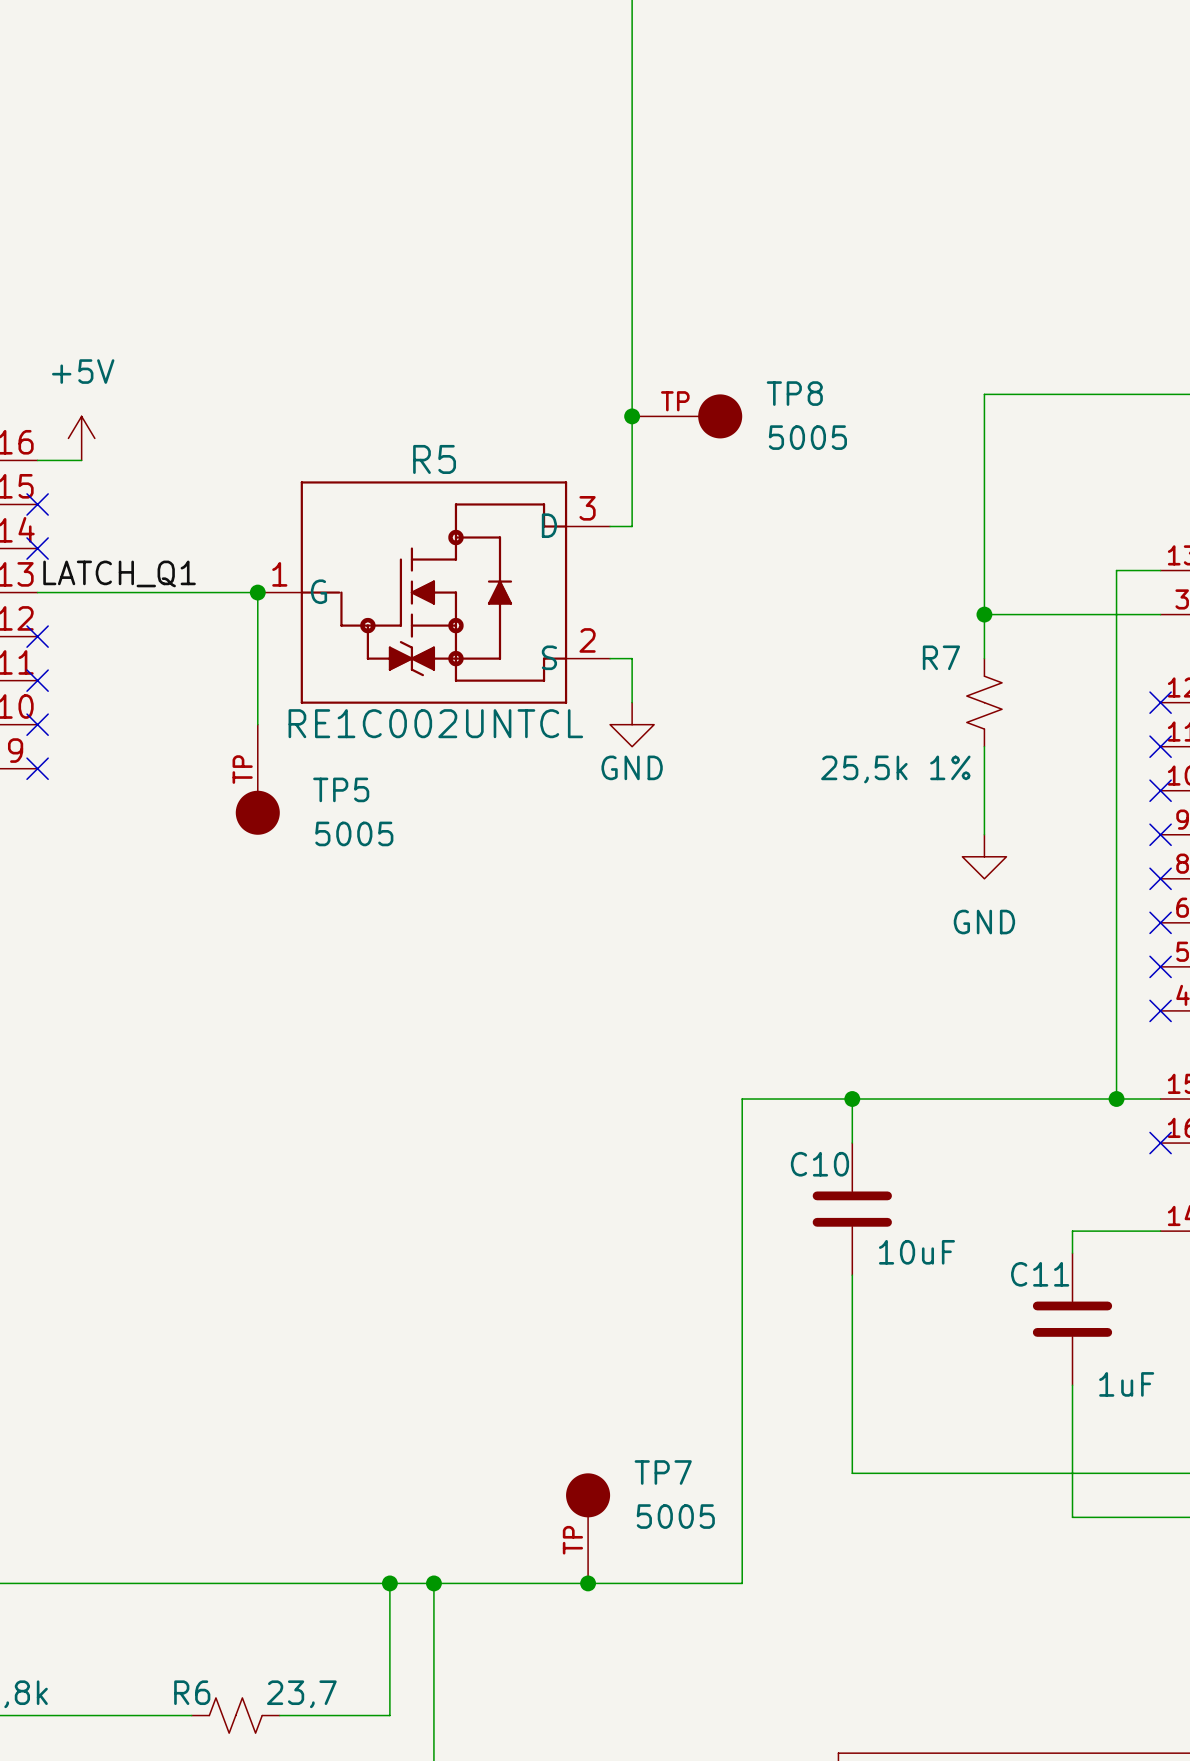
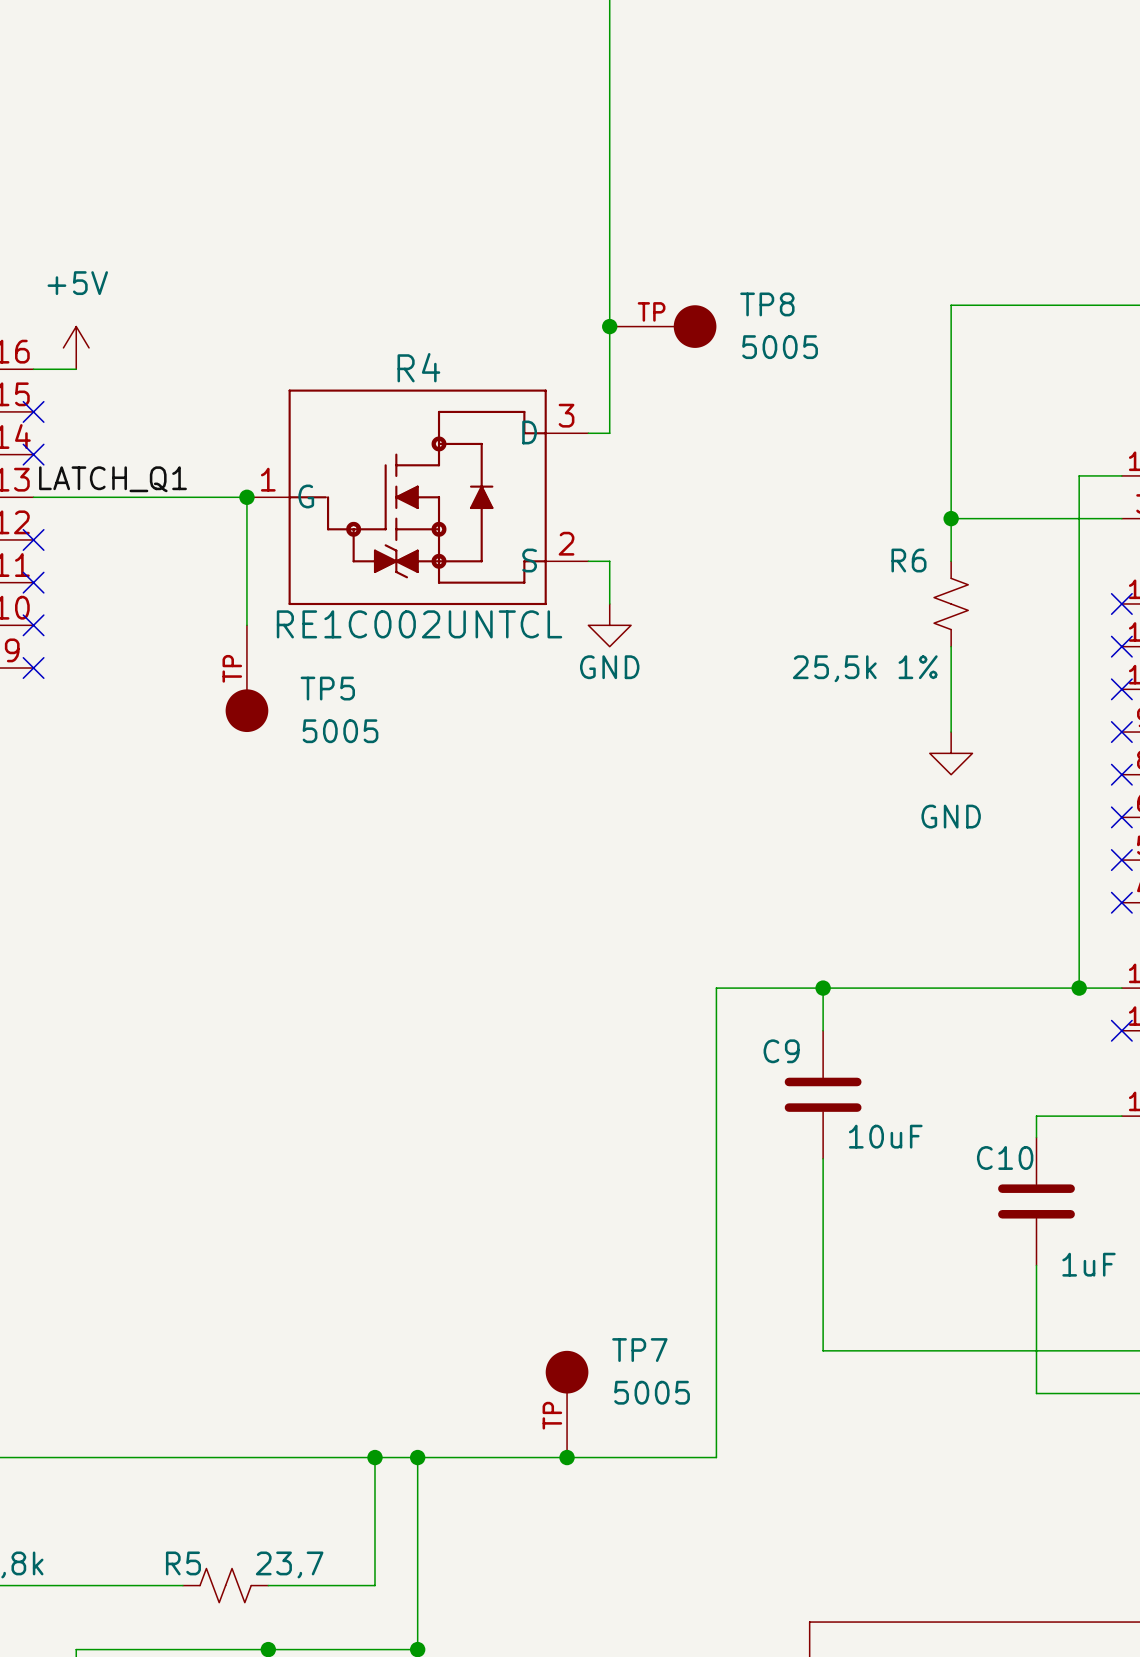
R5 name: R5 (434, 459) -> R4 (418, 367)
R7 name: R7 (941, 657) -> R6 (908, 560)
C10 name: C10 (819, 1164) -> C9 (781, 1051)
C11 name: C11 (1040, 1274) -> C10 (1005, 1158)
R6 name: R6 (192, 1692) -> R5 (183, 1563)

